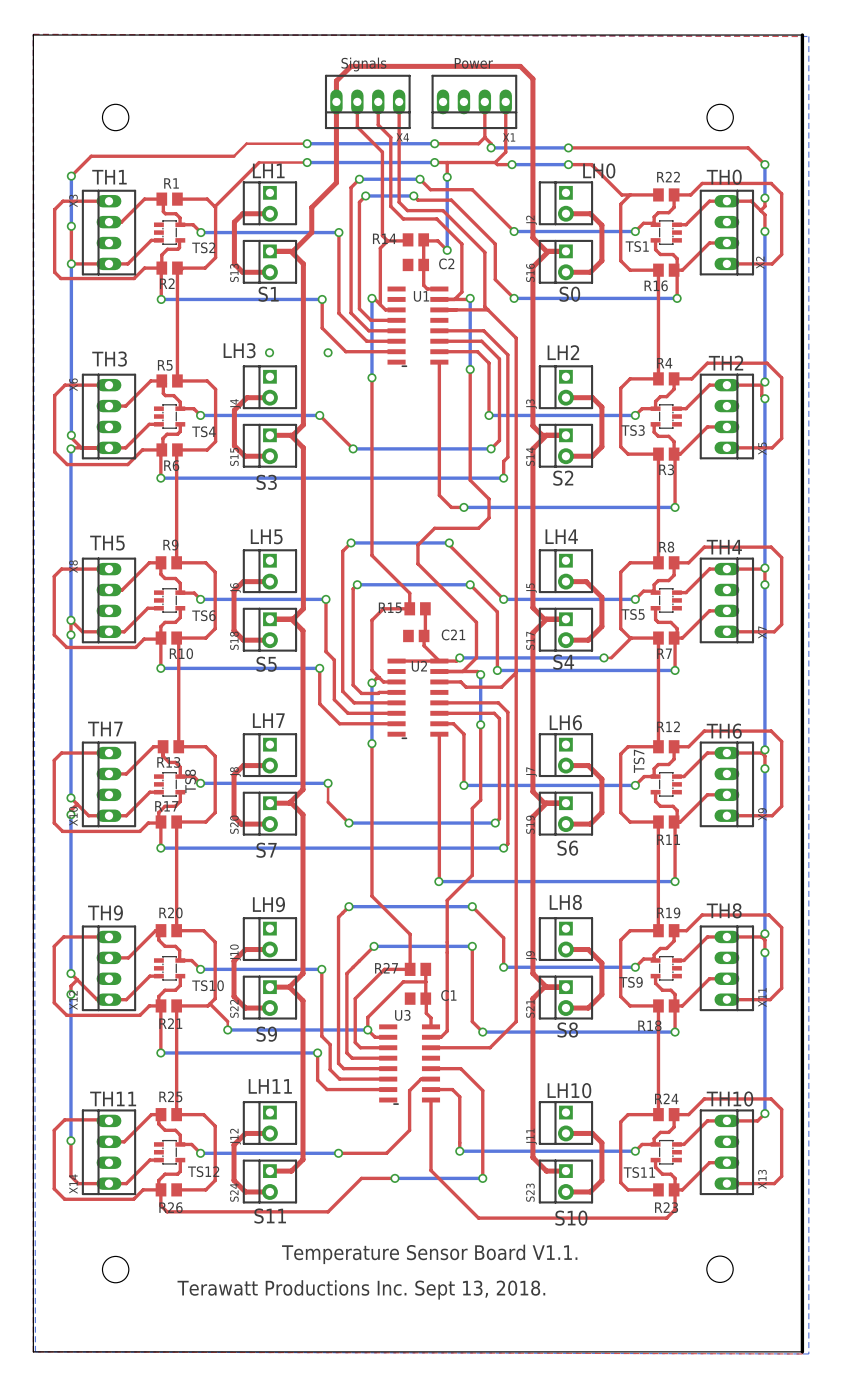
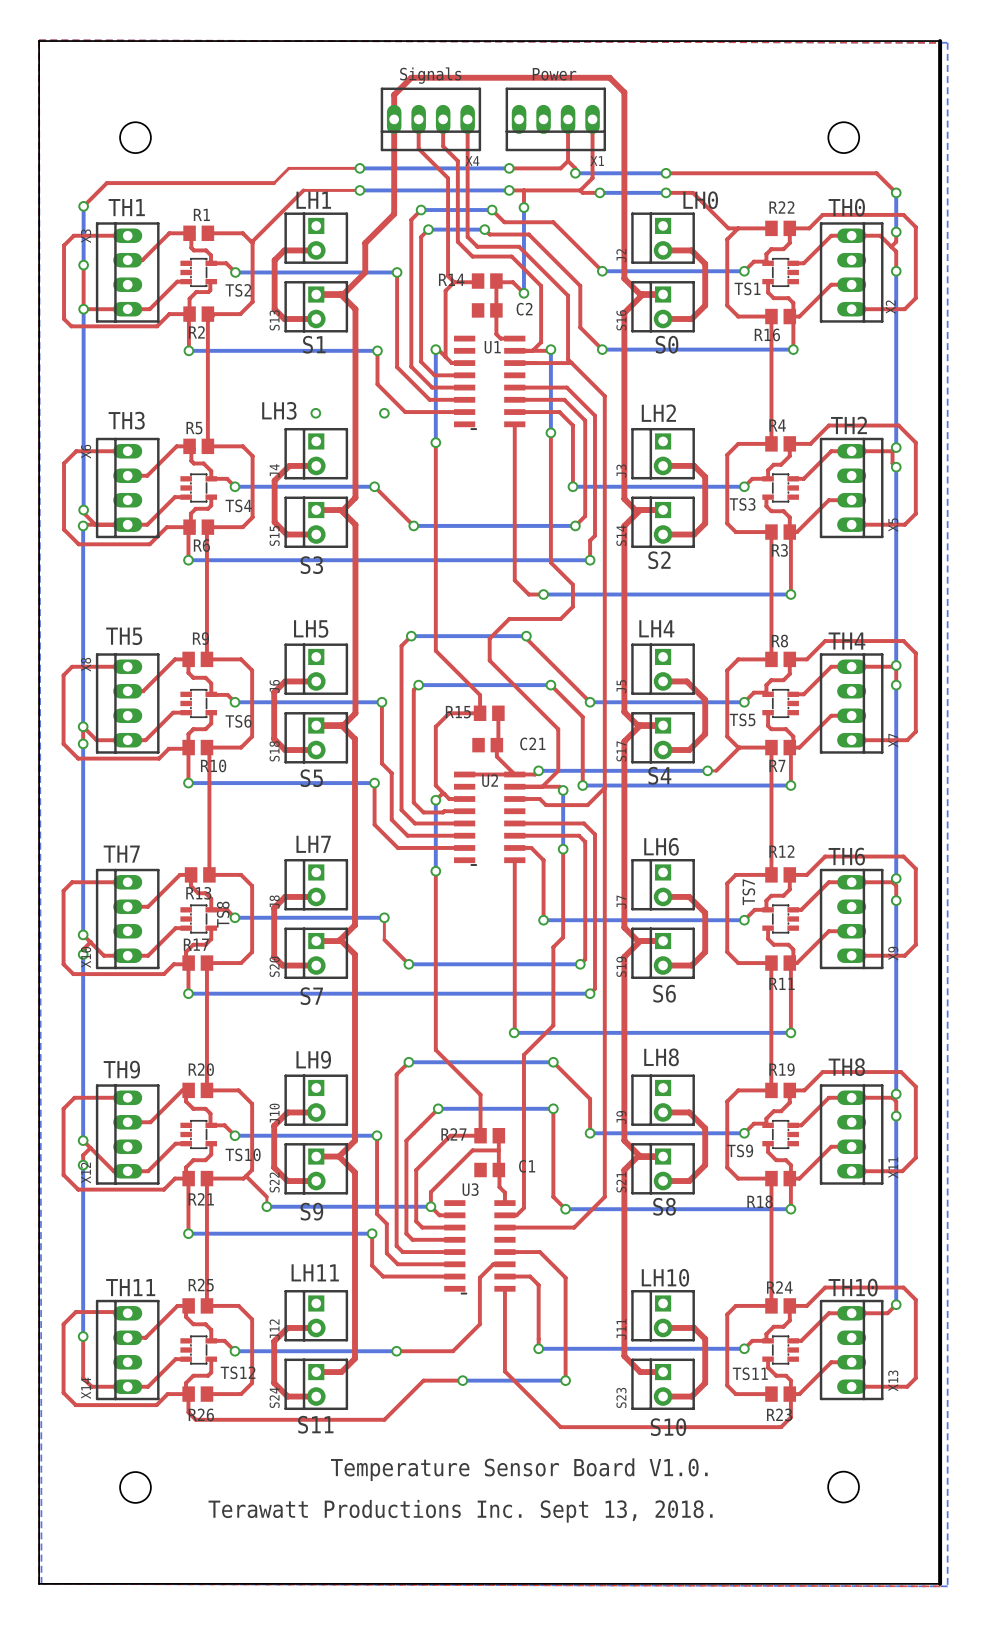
text: Temperature Sensor Board V1.1. (429, 1254) -> Temperature Sensor Board V1.0. (519, 1469)

